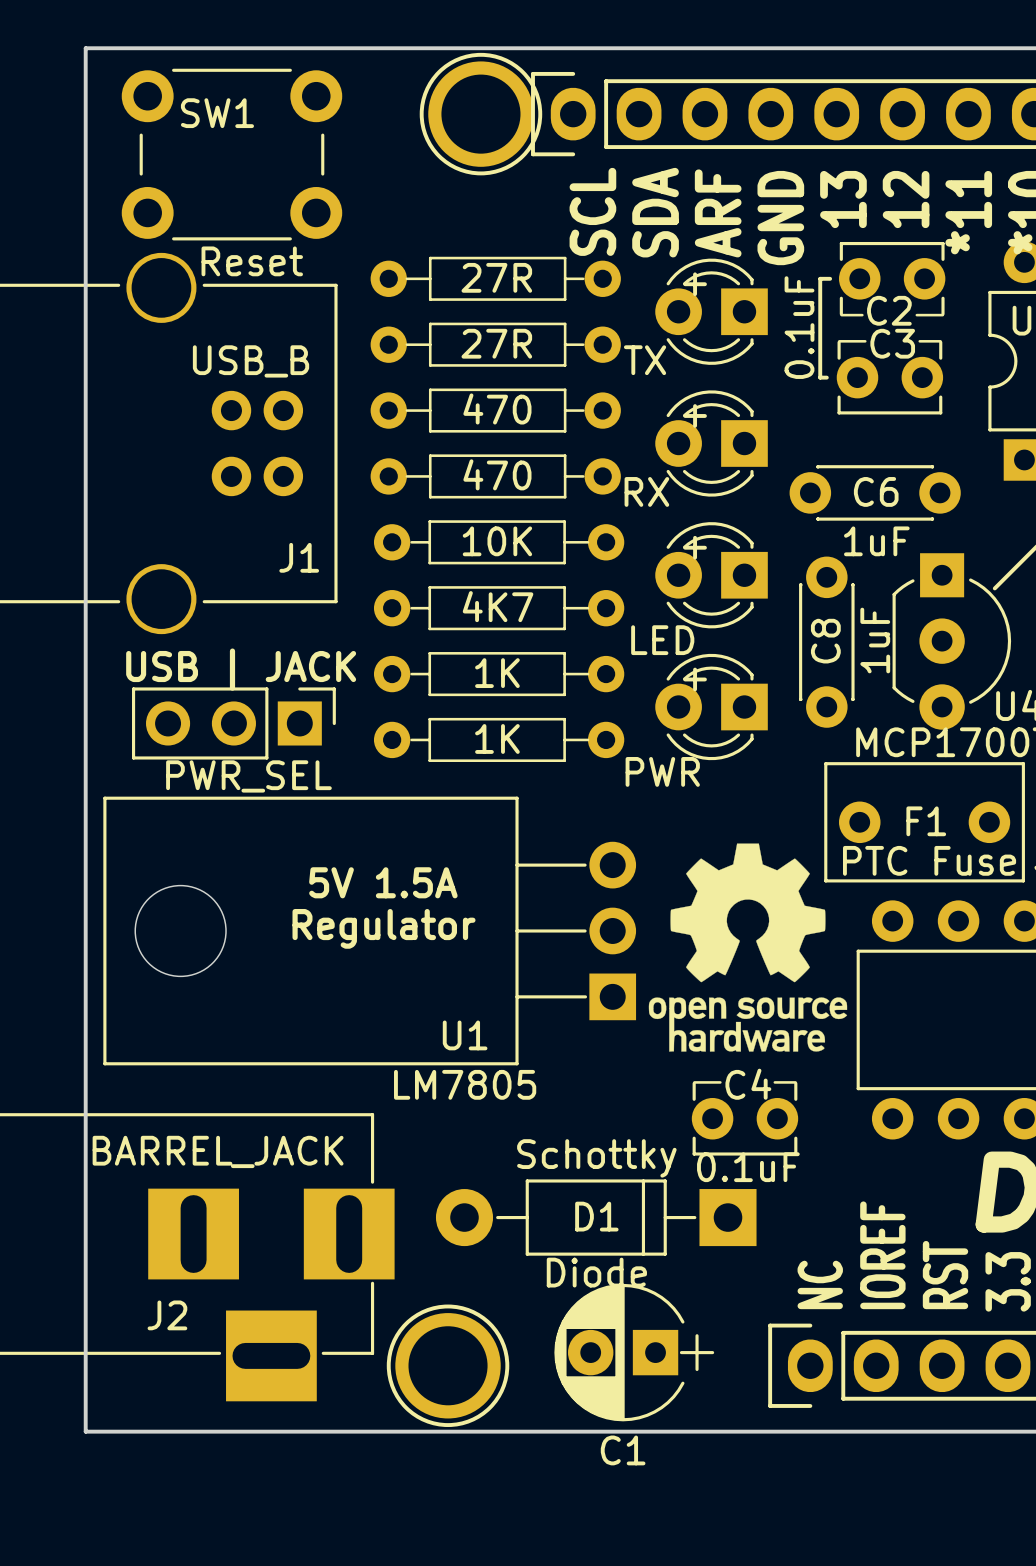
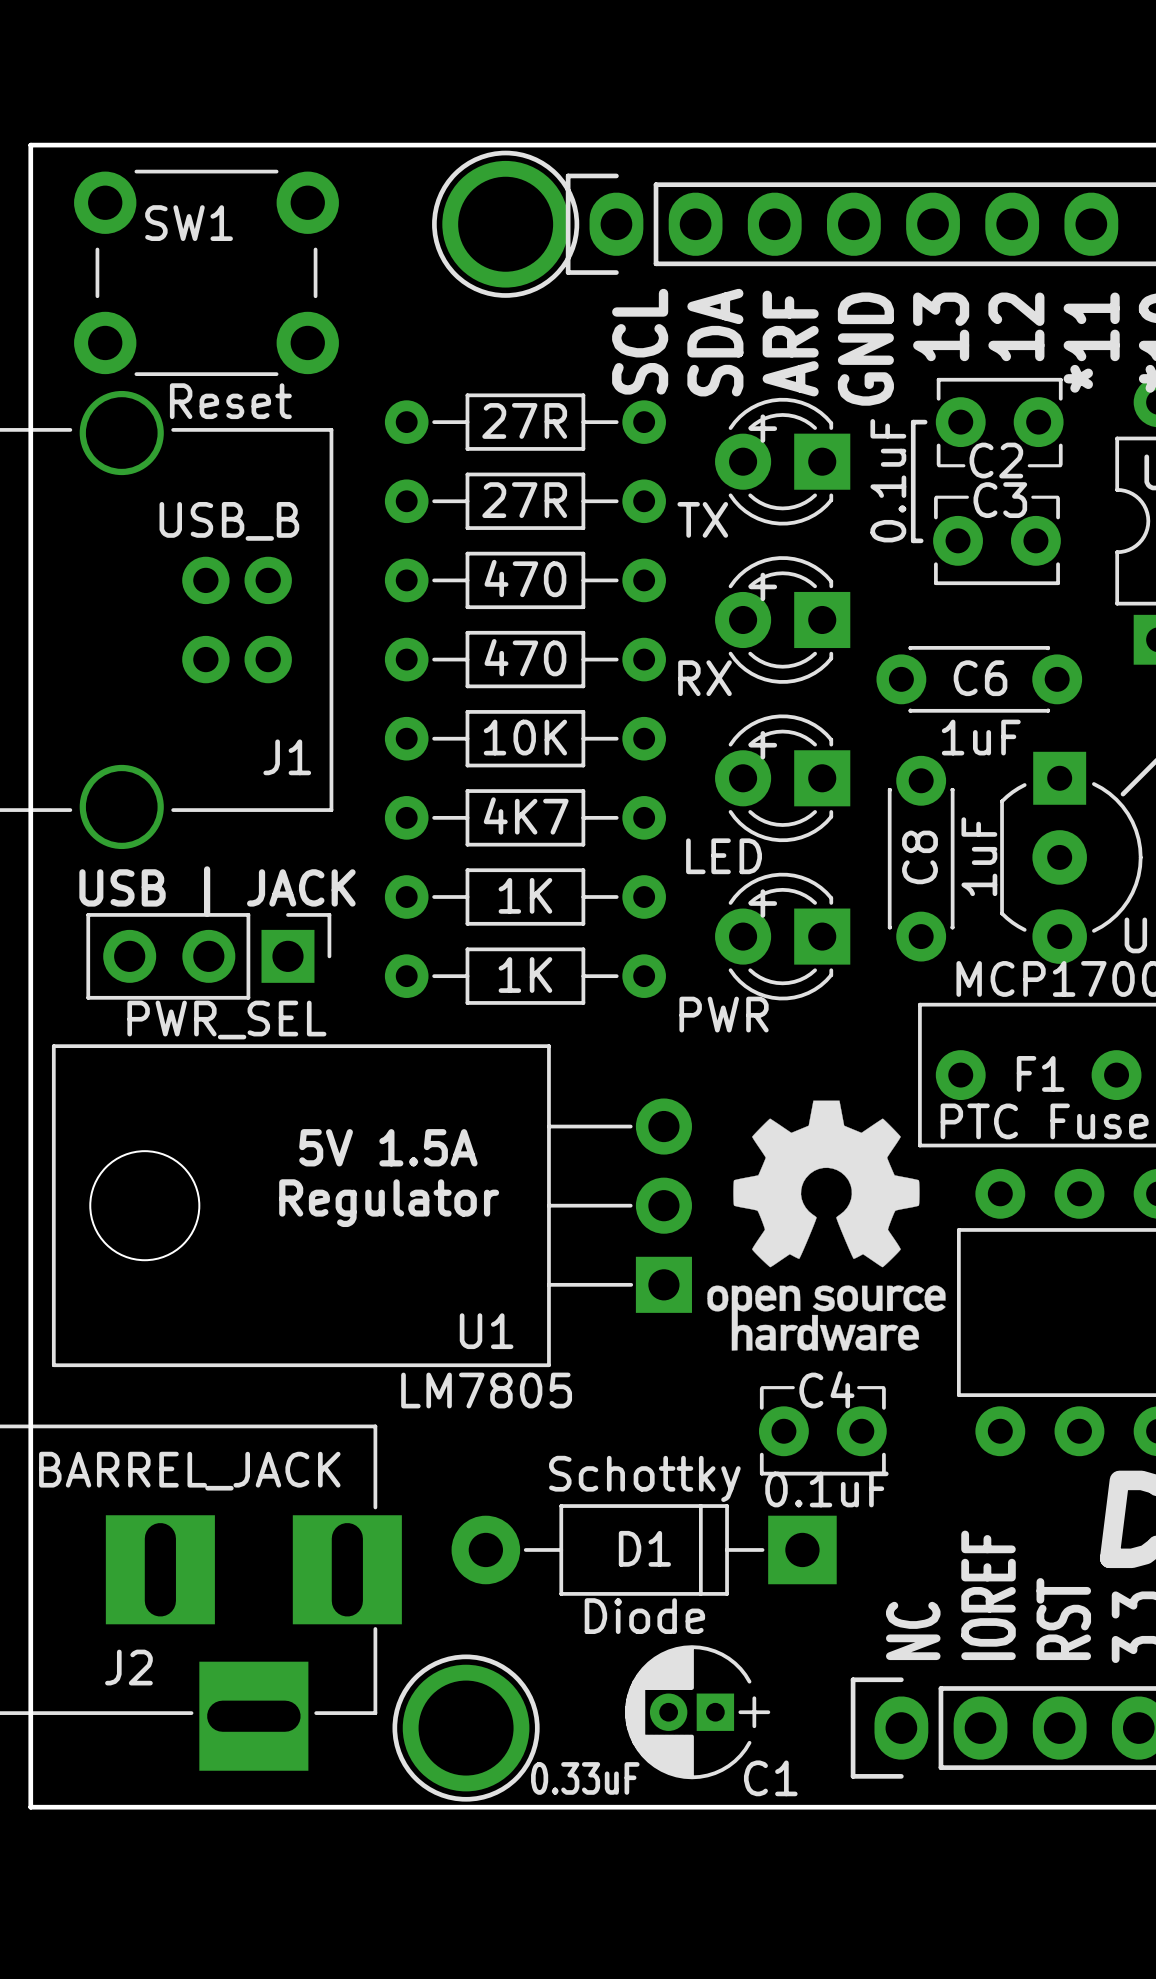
part footprint: [370, 256, 621, 301] -> [384, 393, 666, 451]
part footprint: [370, 322, 621, 367] -> [384, 472, 666, 530]
part footprint: [370, 388, 621, 433] -> [384, 551, 666, 610]
part footprint: [370, 454, 621, 499] -> [384, 630, 666, 689]
part footprint: [373, 520, 625, 565] -> [384, 710, 666, 768]
part footprint: [373, 586, 625, 631] -> [384, 789, 666, 847]
part footprint: [373, 652, 625, 697] -> [384, 868, 666, 926]
part footprint: [373, 717, 625, 762] -> [384, 947, 666, 1005]
C1 footprint: [554, 1283, 715, 1422] -> [625, 1645, 771, 1780]
C1 value: none -> 0.33uF (585, 1778)
C1 name position: C1 (623, 1450) -> C1 (770, 1778)

